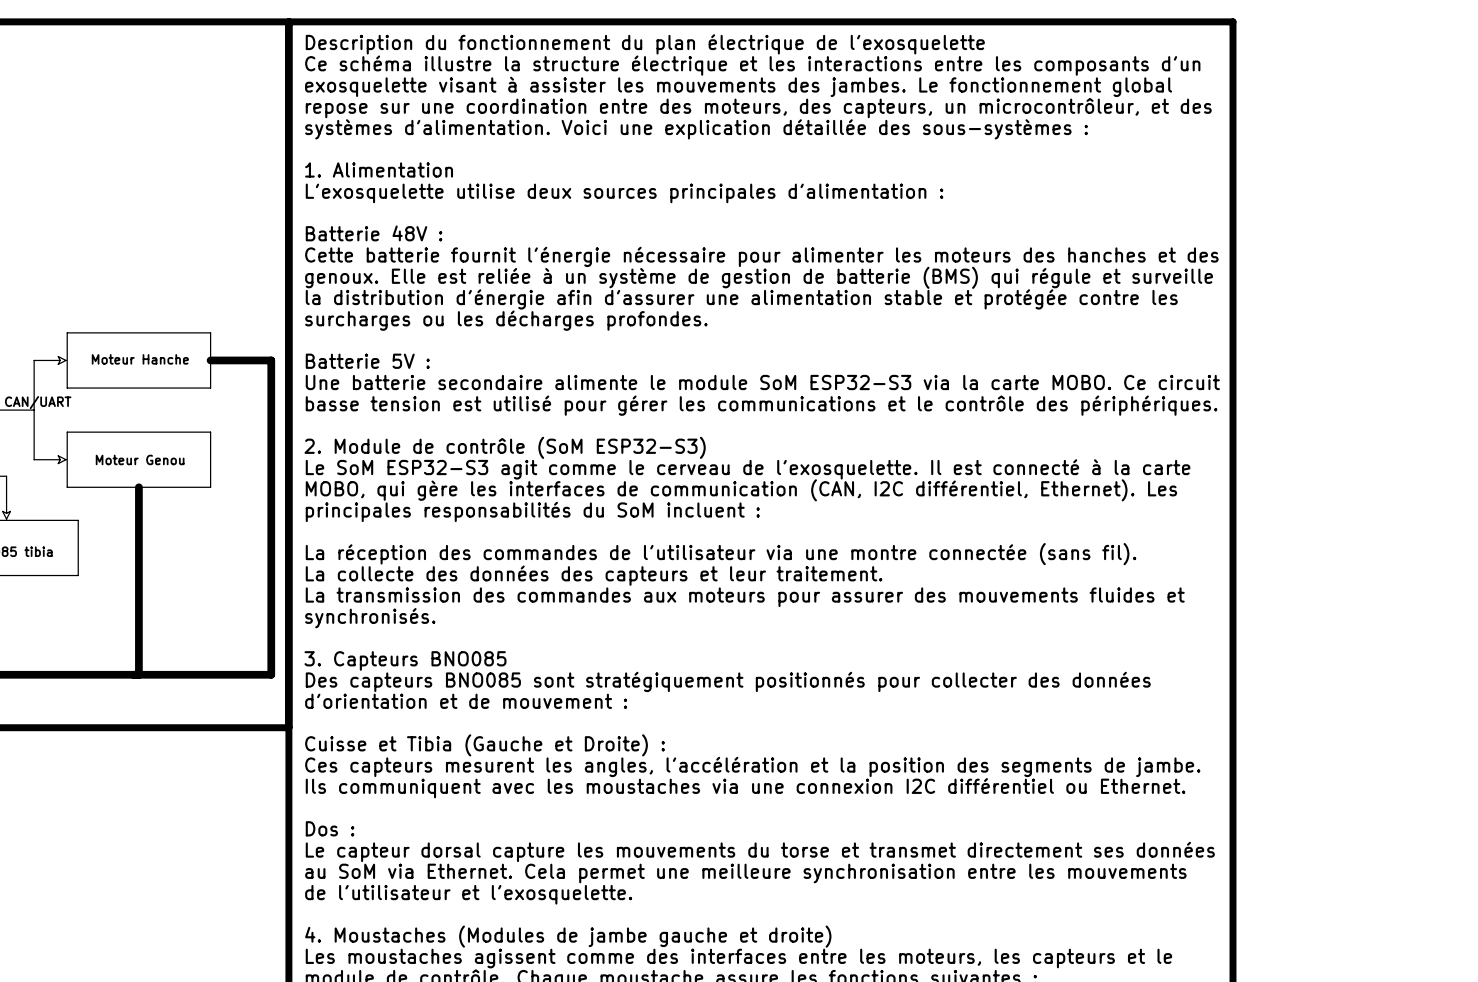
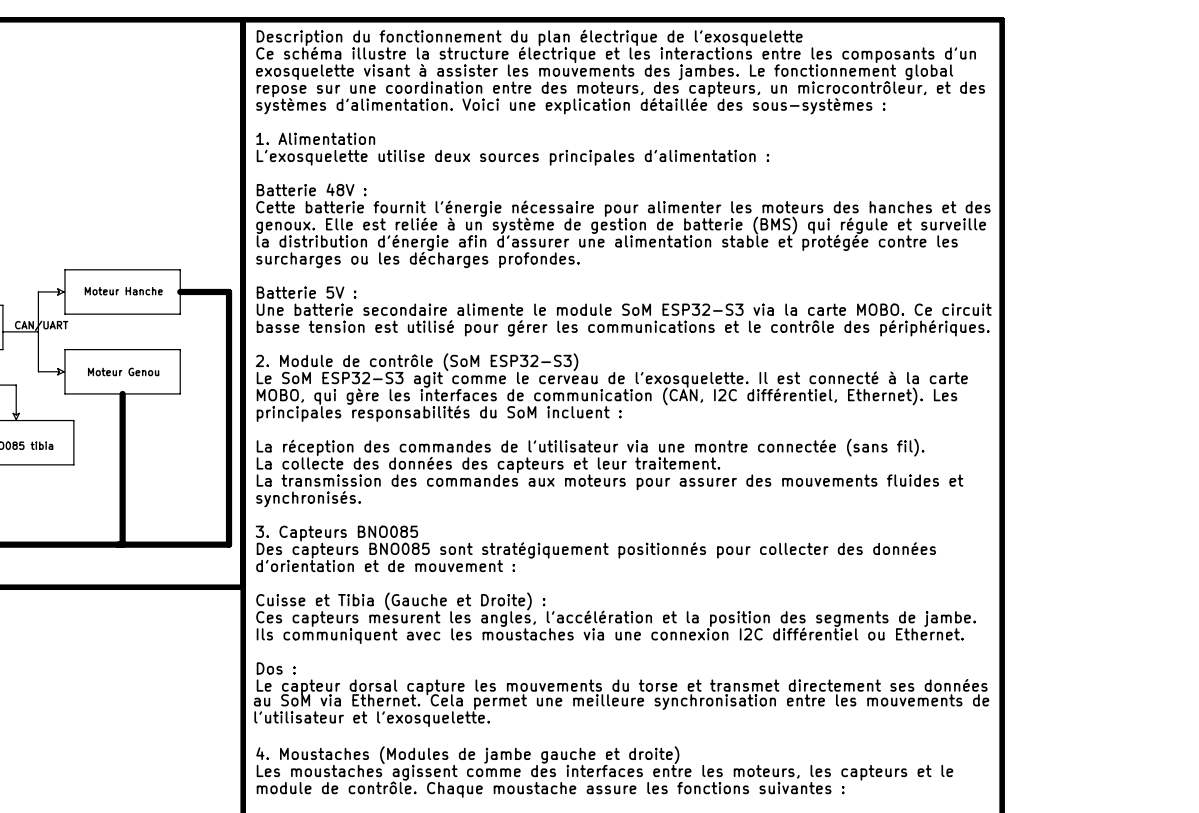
text: au SoM via Ethernet. Cela permet une meilleure synchronisation entre les mouvements (745, 873) -> au SoM via Ethernet. Cela permet une meilleure synchronisation entre les mouvements de (621, 702)
text: de l'utilisateur et l'exosquelette. (468, 894) -> l'utilisateur et l'exosquelette. (372, 719)

